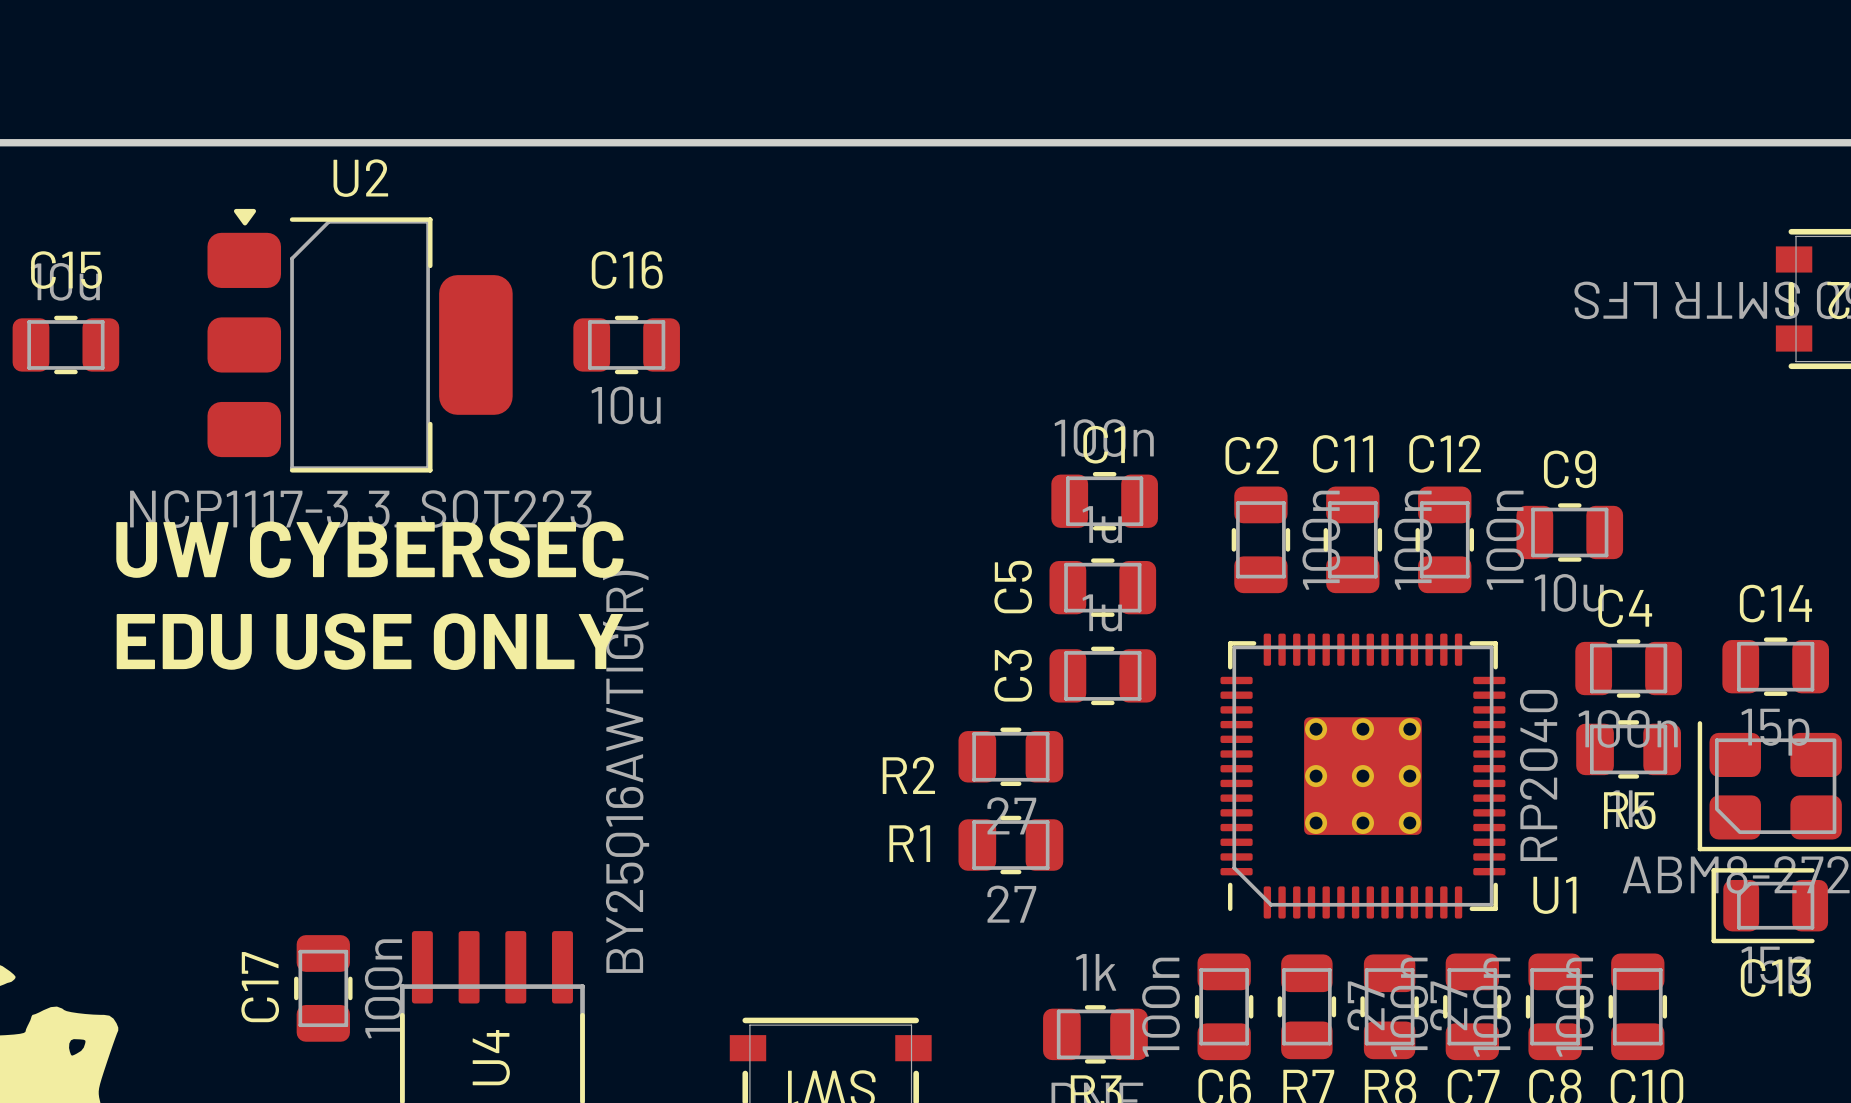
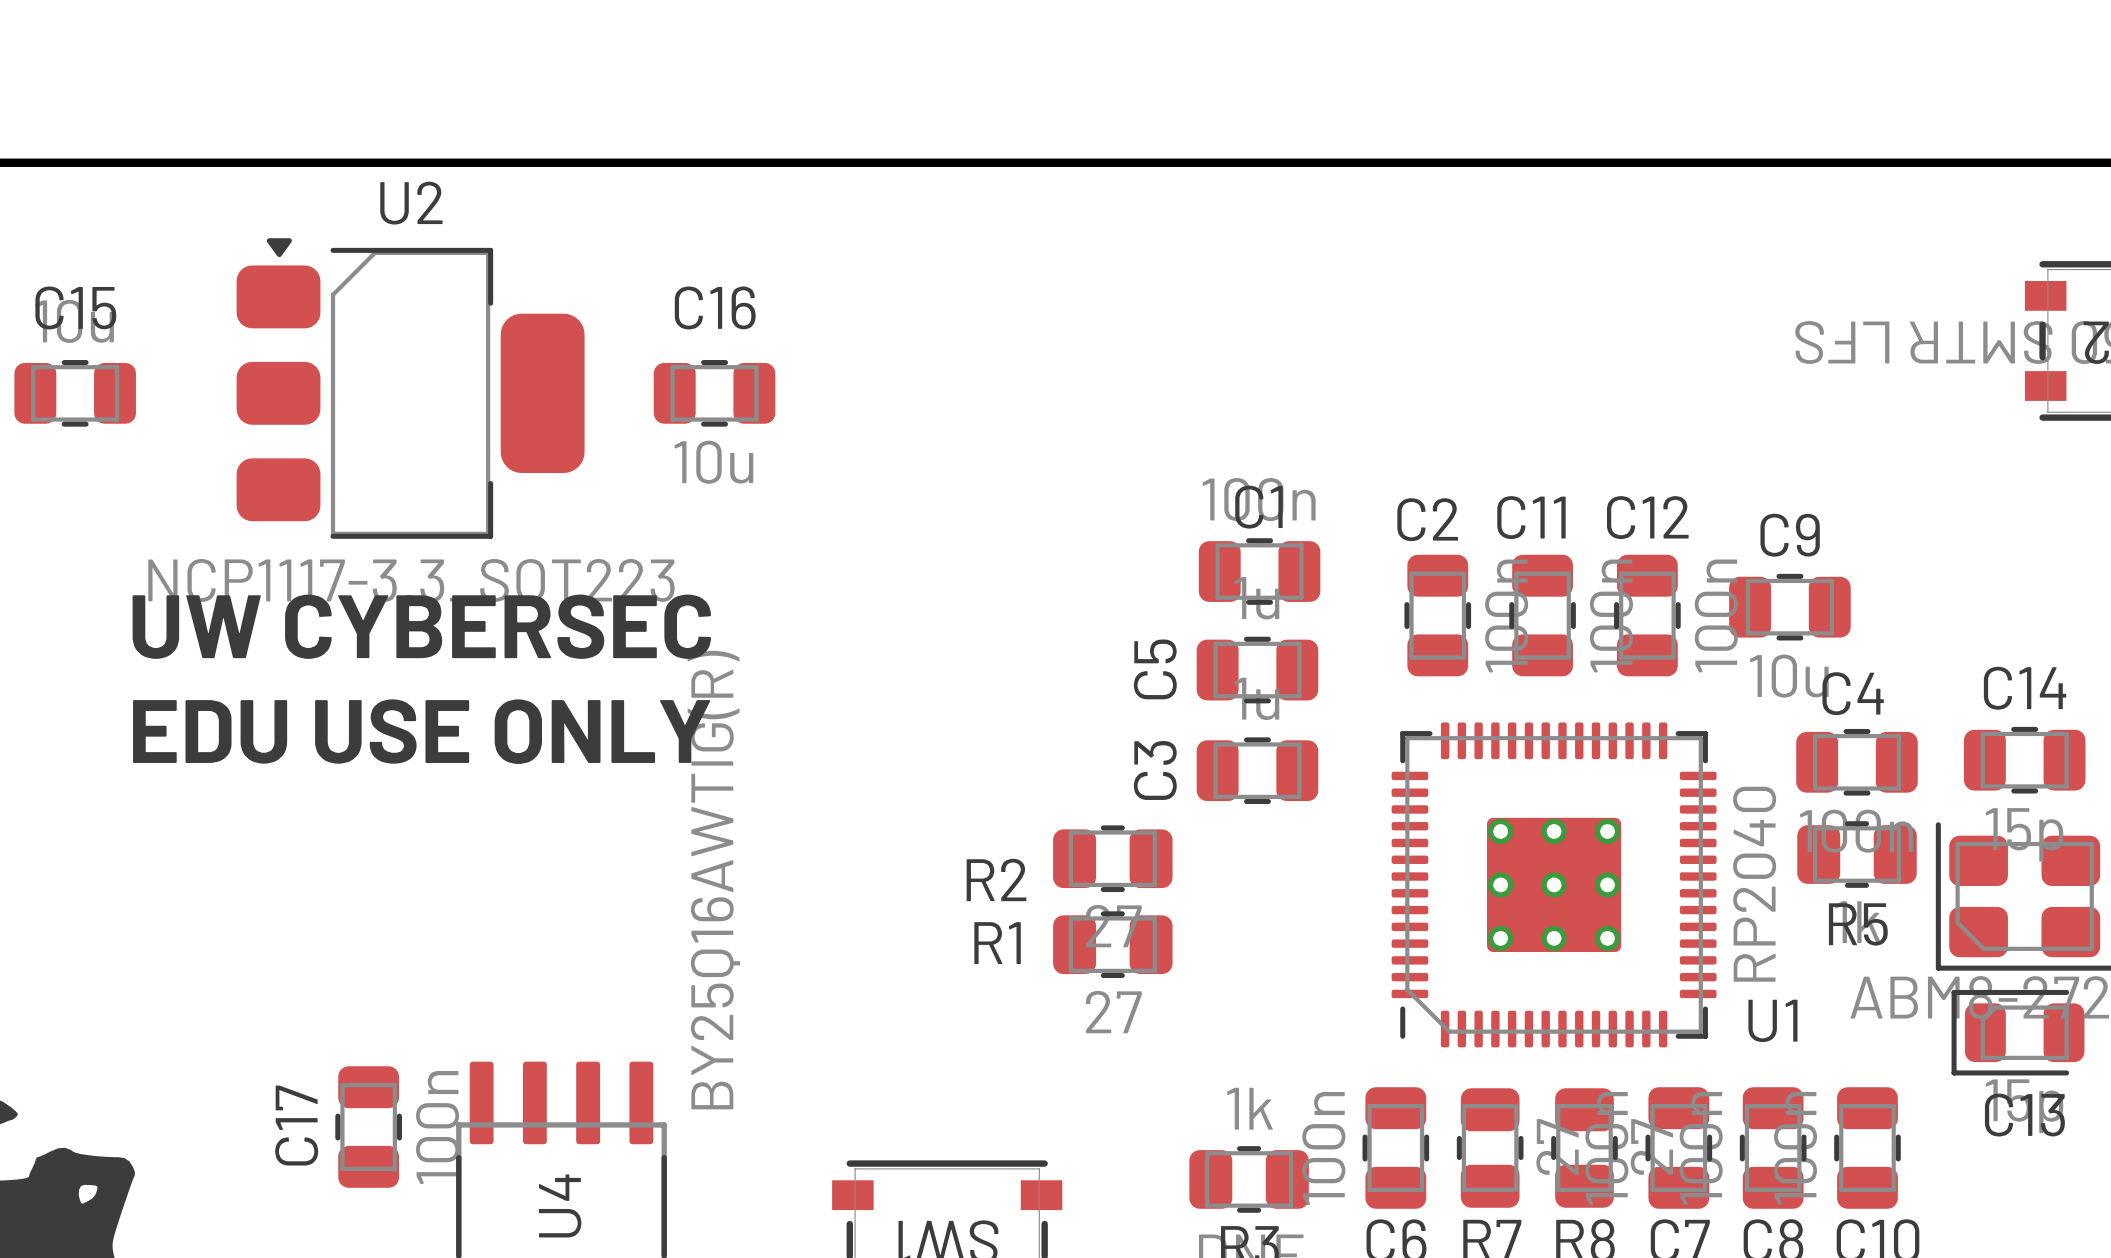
R2 position: (1010, 756) -> (1112, 858)
R1 position: (1010, 845) -> (1112, 944)

